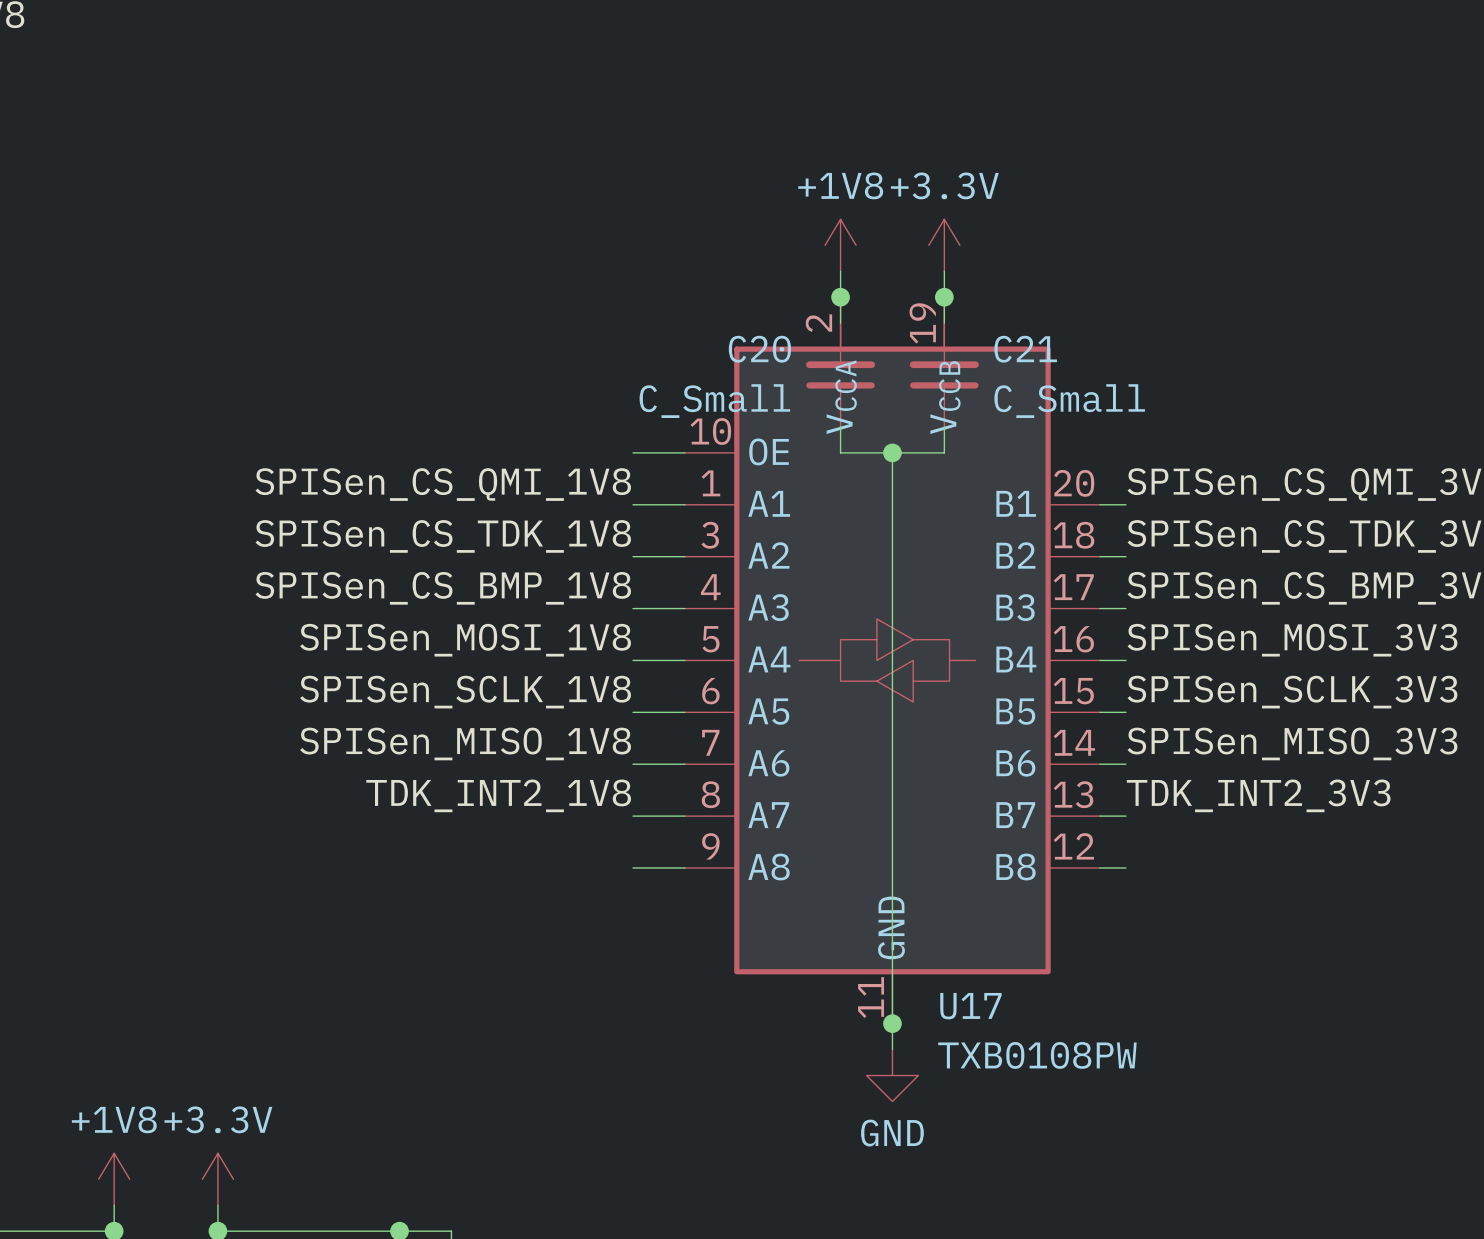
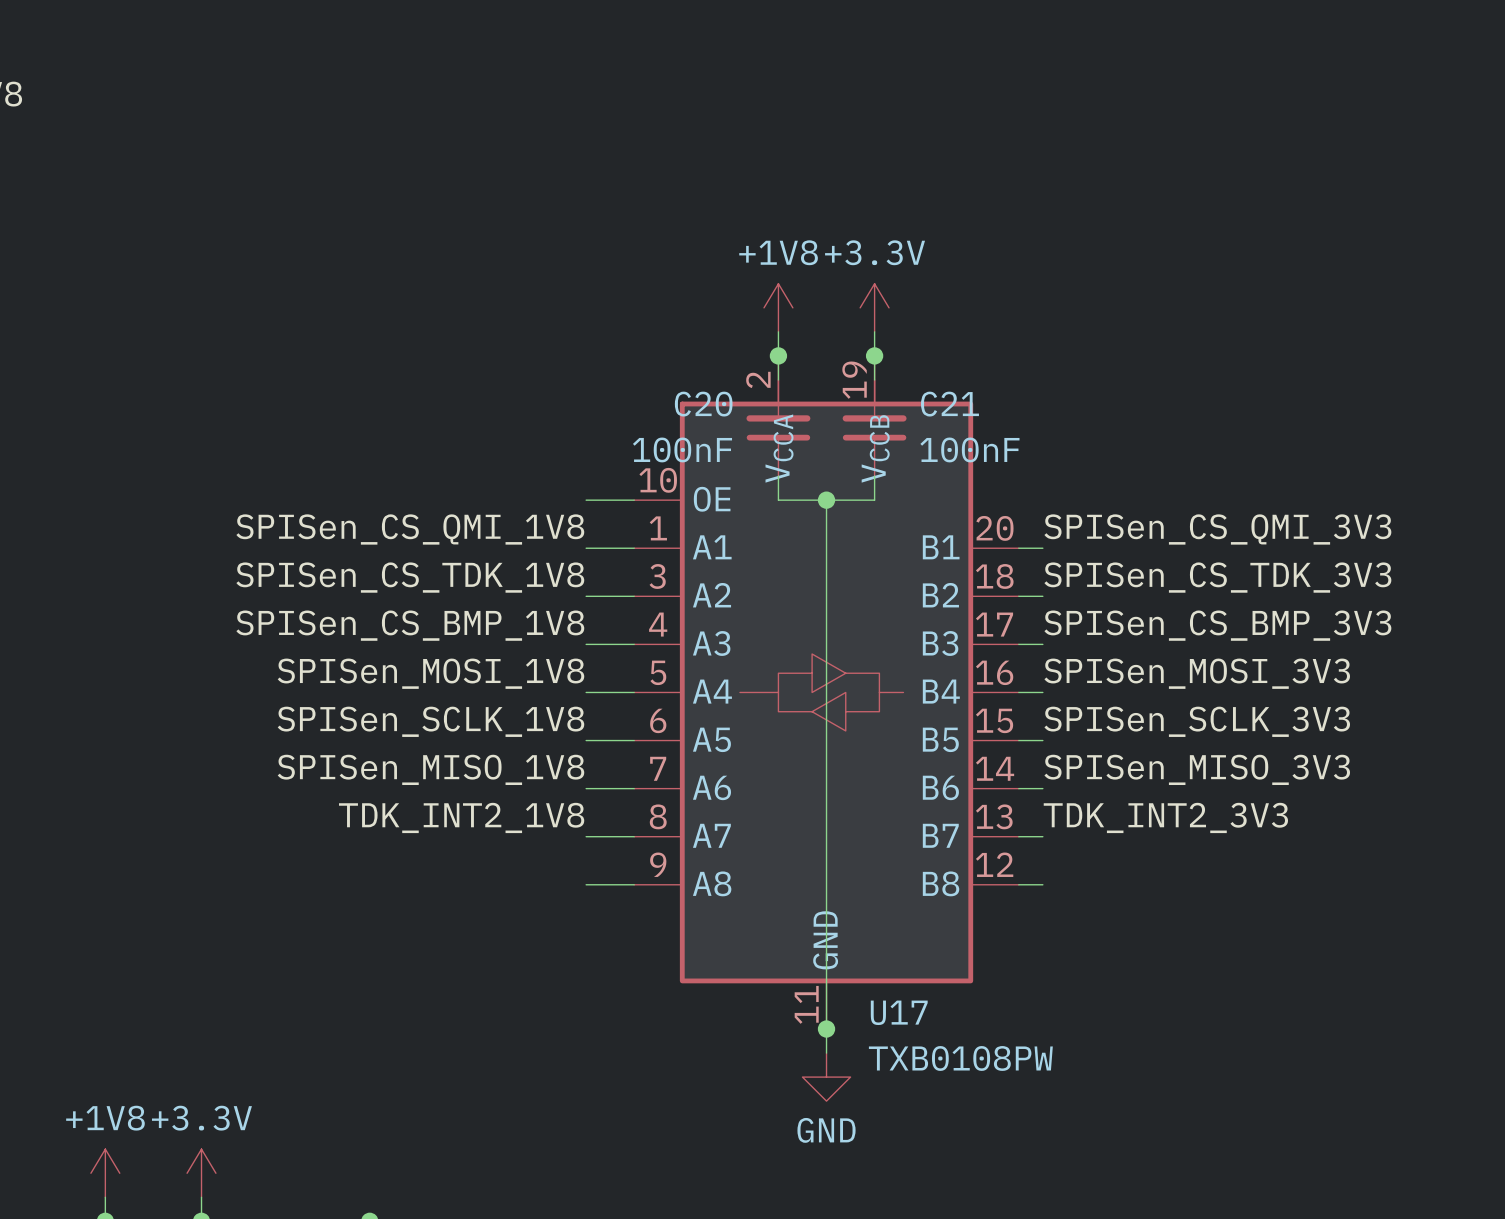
C20 value: C_Small (714, 401) -> 100nF (682, 449)
C21 value: C_Small (1069, 401) -> 100nF (969, 449)

